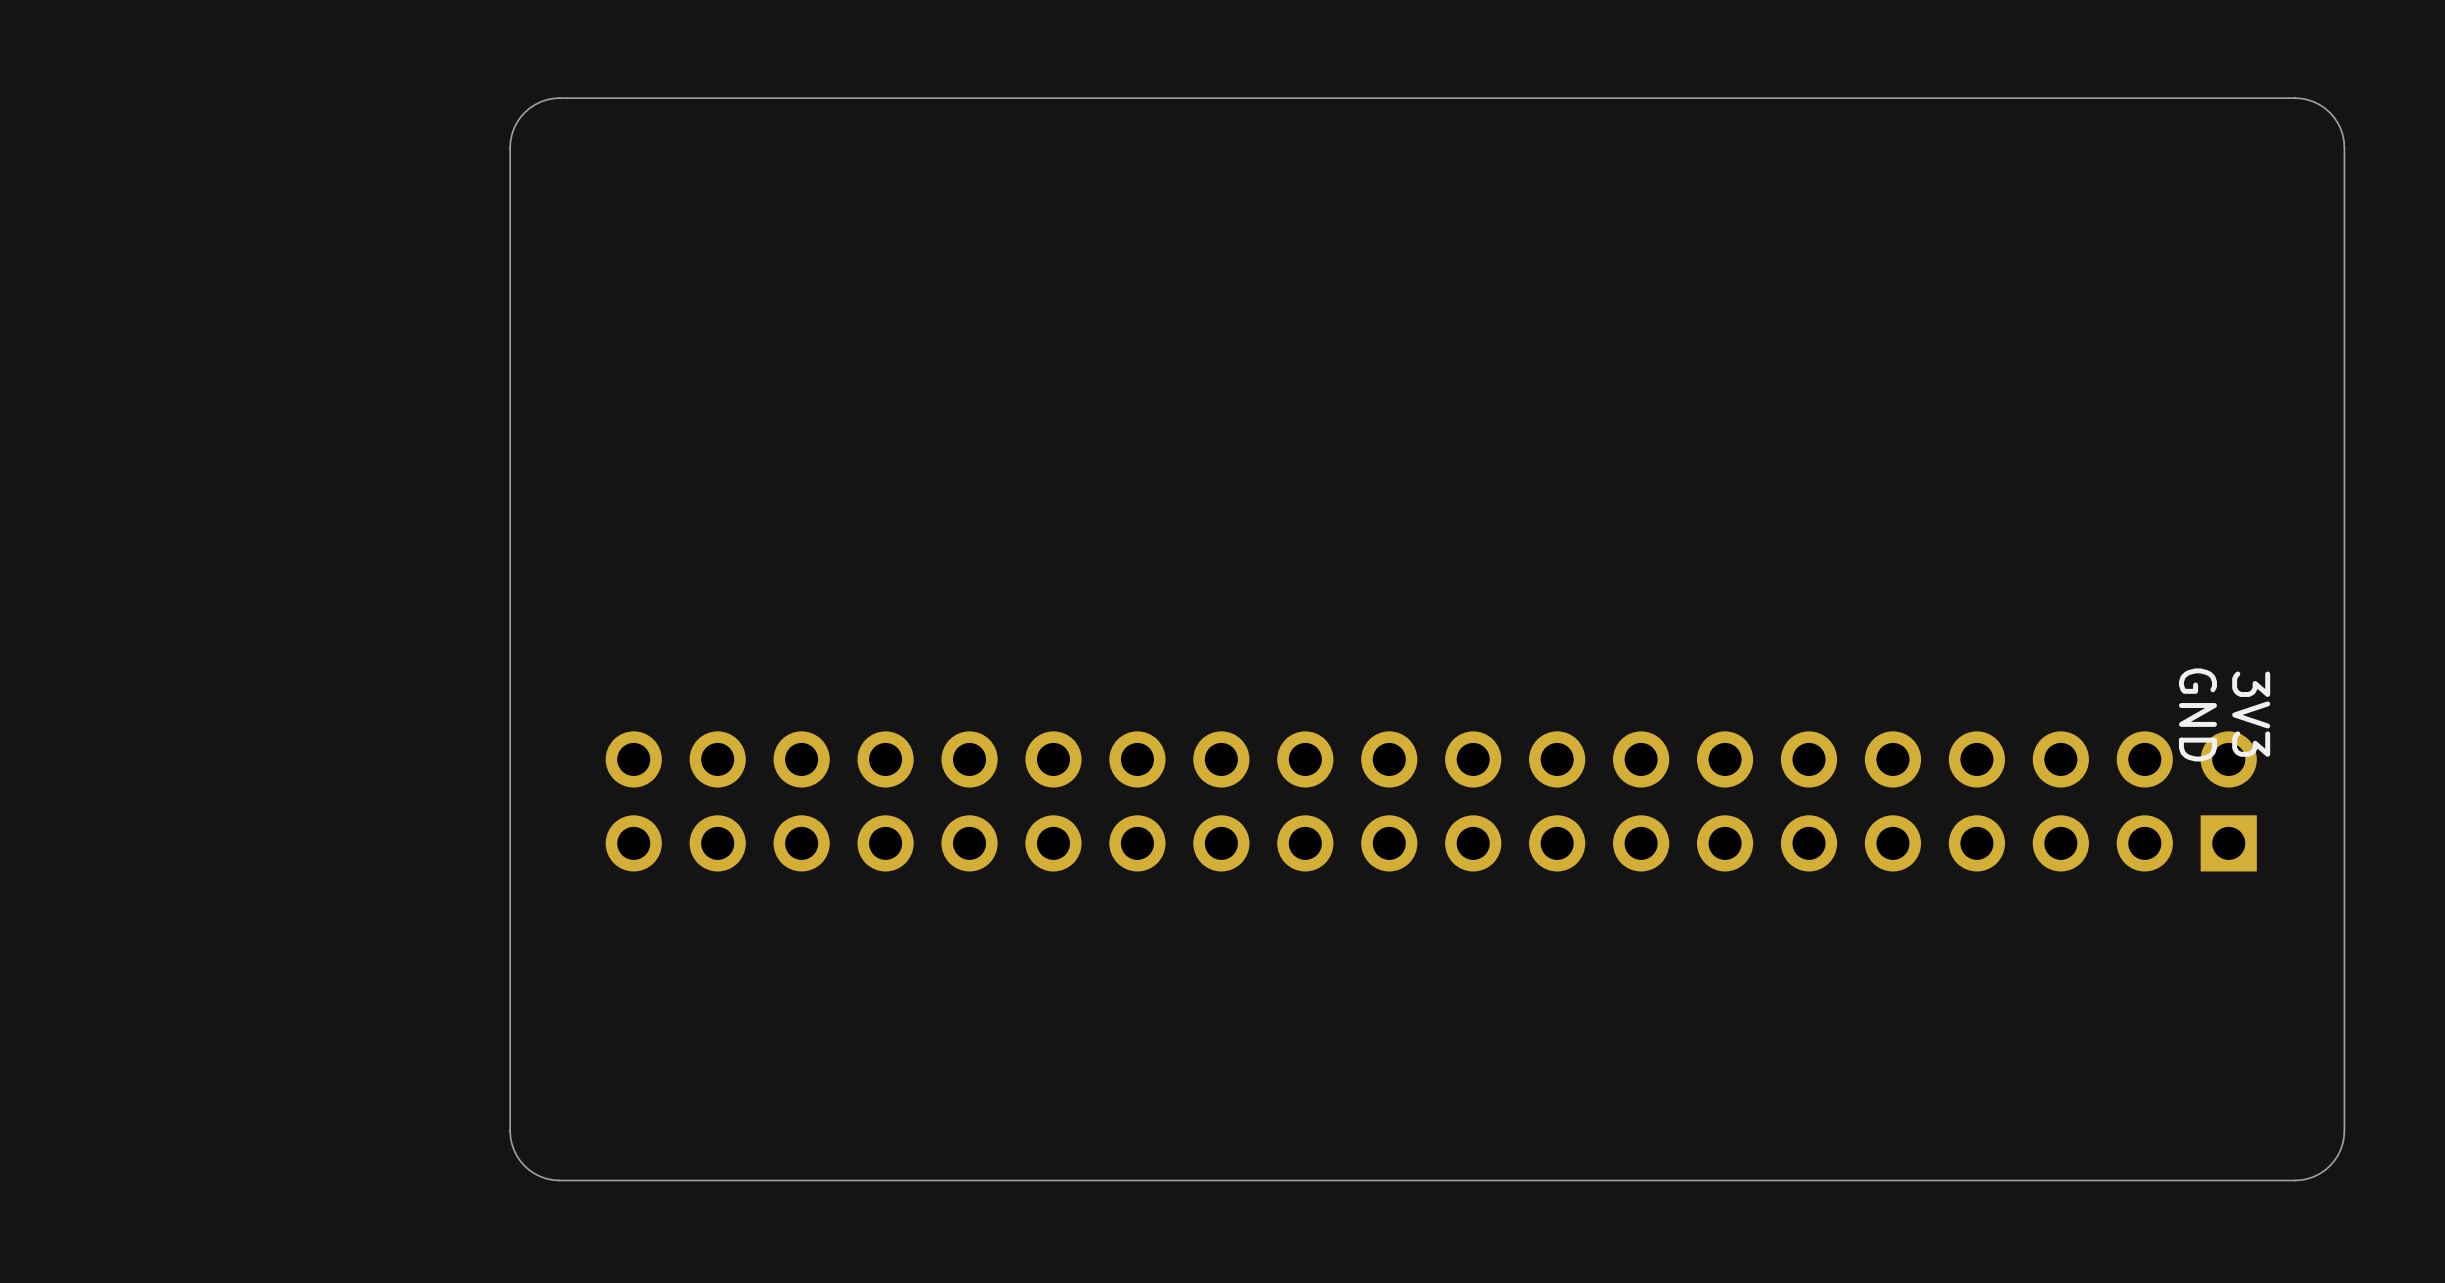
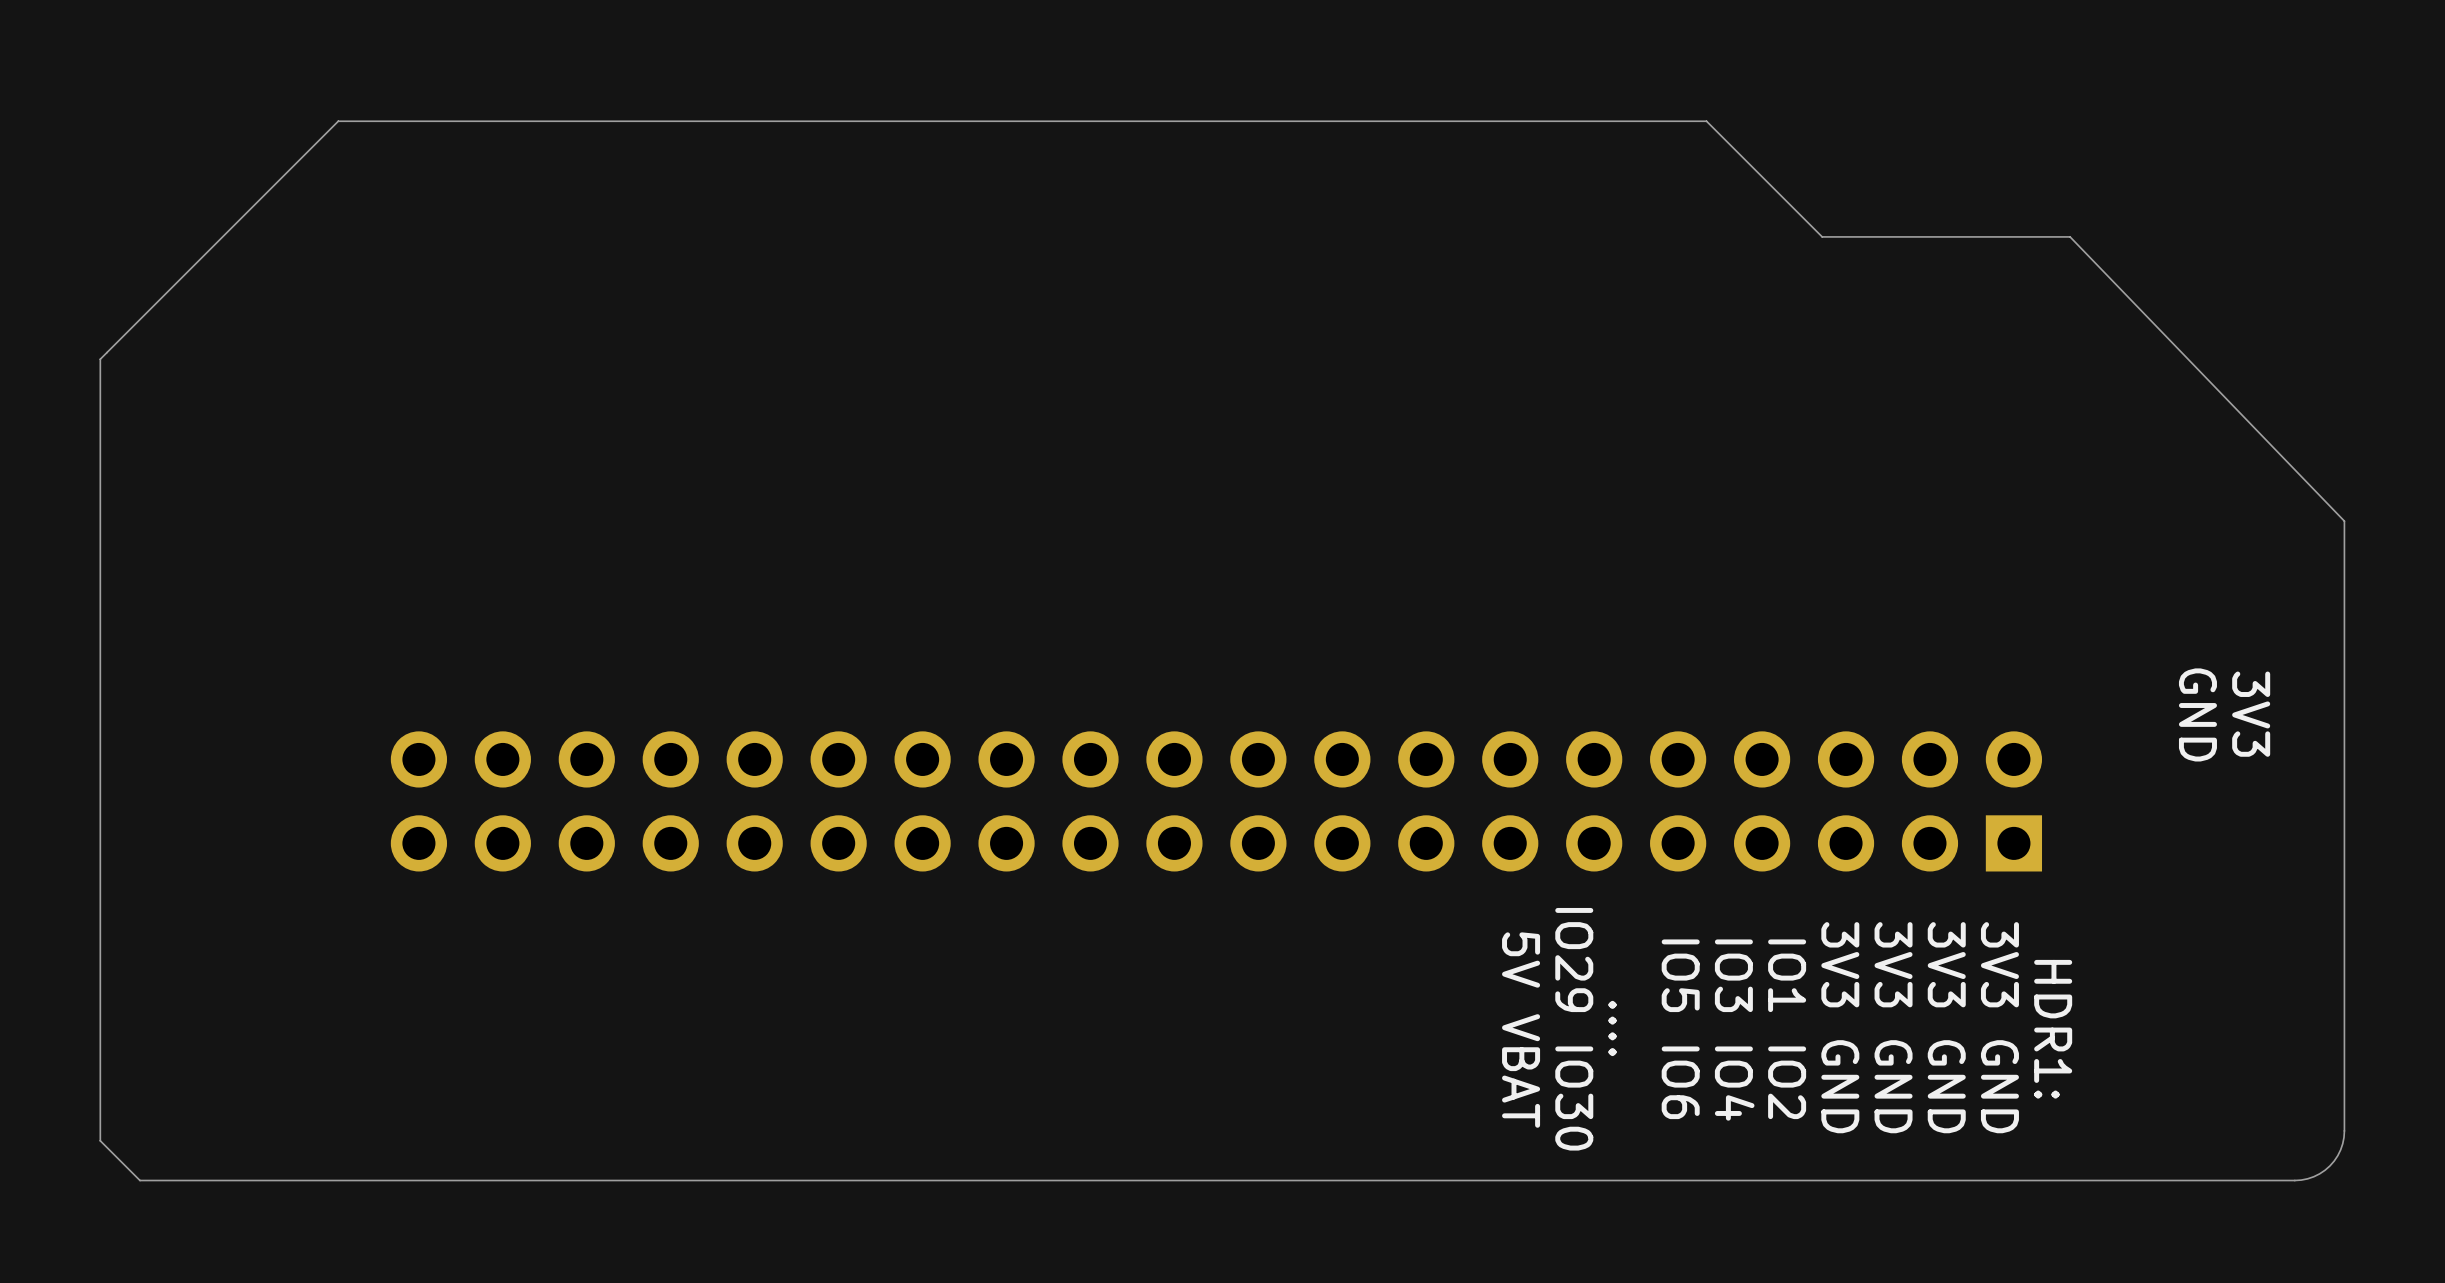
board edge: (2344, 521) (2344, 141) (2340, 128) (2334, 117) (2319, 104) (2307, 99) (2294, 98) (559, 98) (540, 101) (529, 108) (520, 117) (511, 134) (510, 147) (510, 1130) (513, 1149) (524, 1165) (540, 1176) (559, 1180) -> (2344, 521) (2070, 236) (1822, 236) (1706, 121) (338, 121) (100, 359) (100, 1140) (139, 1180) (559, 1180)
part position: (1431, 801) -> (1216, 801)
text: none -> 3V3 GND (1840, 1027)
text: none -> 3V3 GND (1893, 1027)
text: none -> 3V3 GND (1946, 1027)
text: none -> 3V3 GND (1999, 1027)
text: none -> .... (1612, 1028)
text: none -> IO29 IO30 (1574, 1029)
text: none -> IO5 IO6 (1680, 1029)
text: none -> IO1 IO2 (1787, 1029)
text: none -> HDR1: (2053, 1029)
text: none -> 5V VBAT (1521, 1030)
text: none -> IO3 IO4 (1734, 1030)

